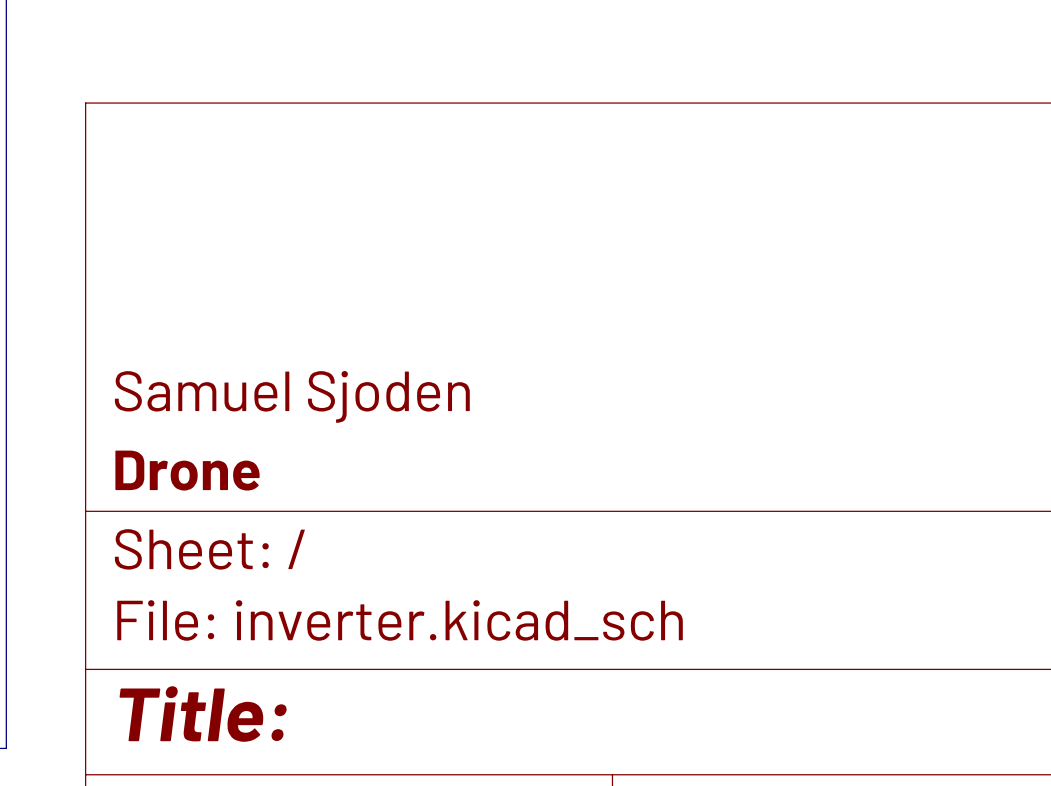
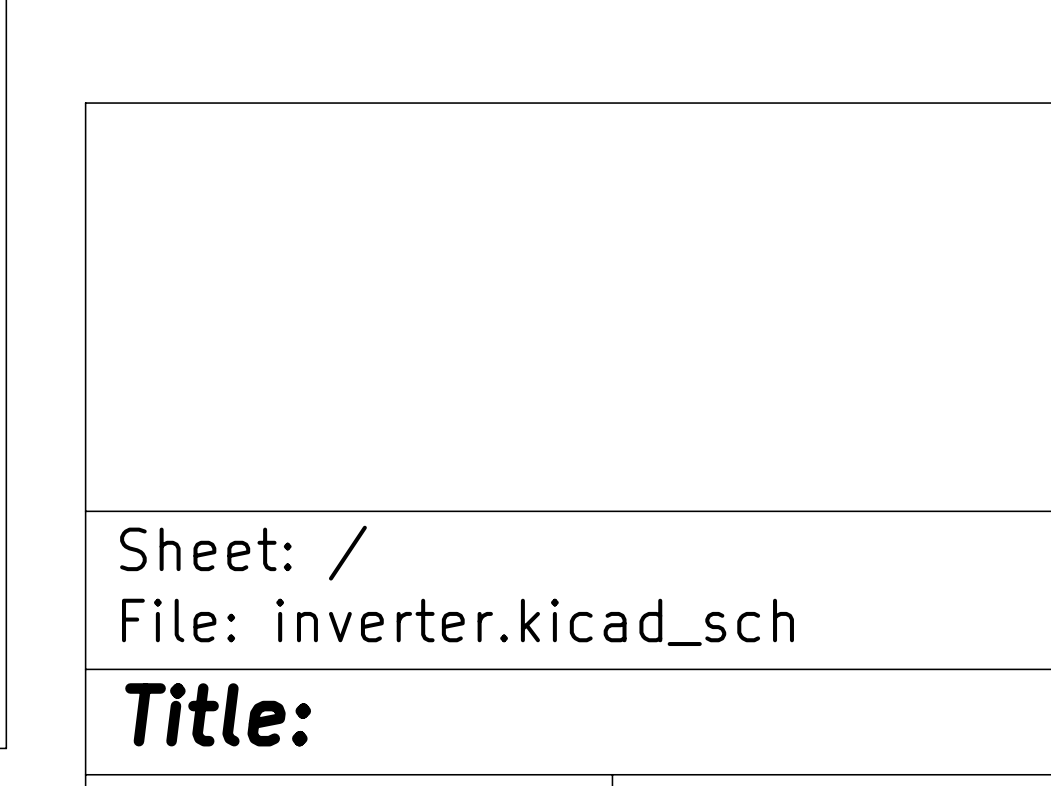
title block: Samuel Sjoden (292, 396) -> none
title block: Drone (187, 470) -> none

